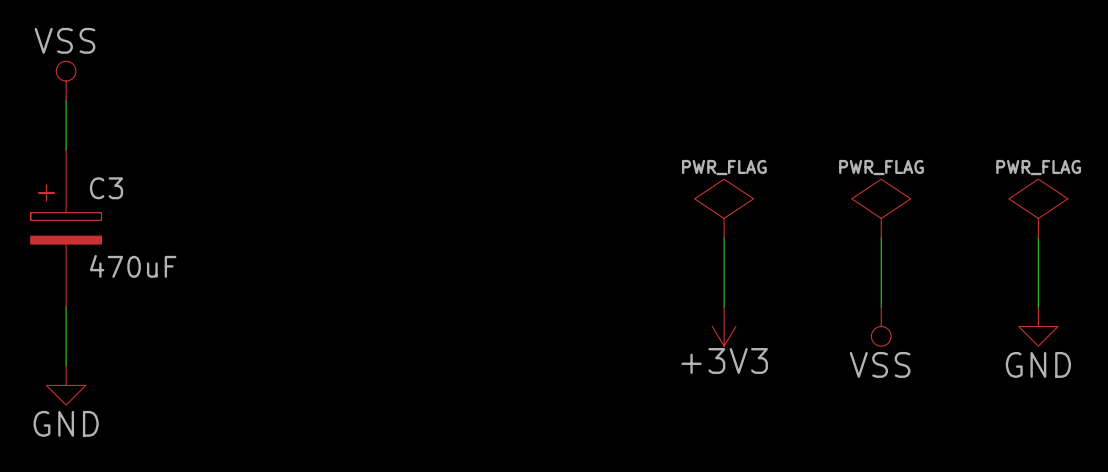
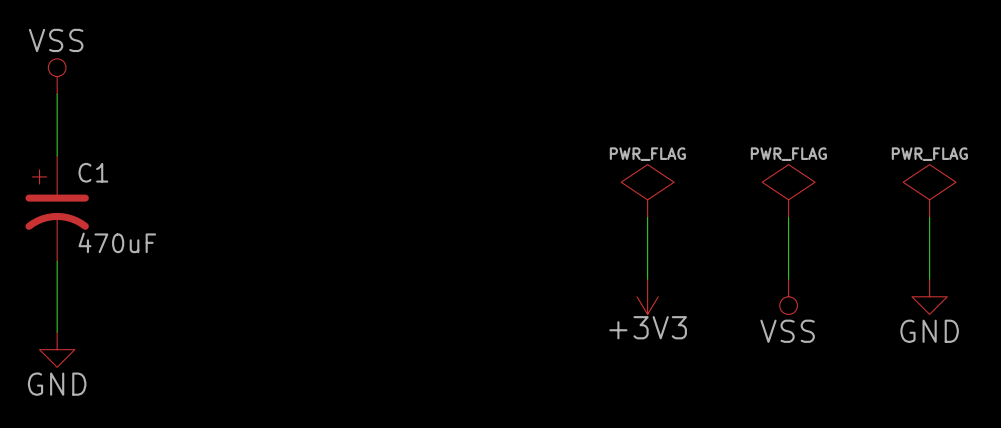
C3: 470uF (66, 228) -> none
C1: none -> 470uF (57, 208)

